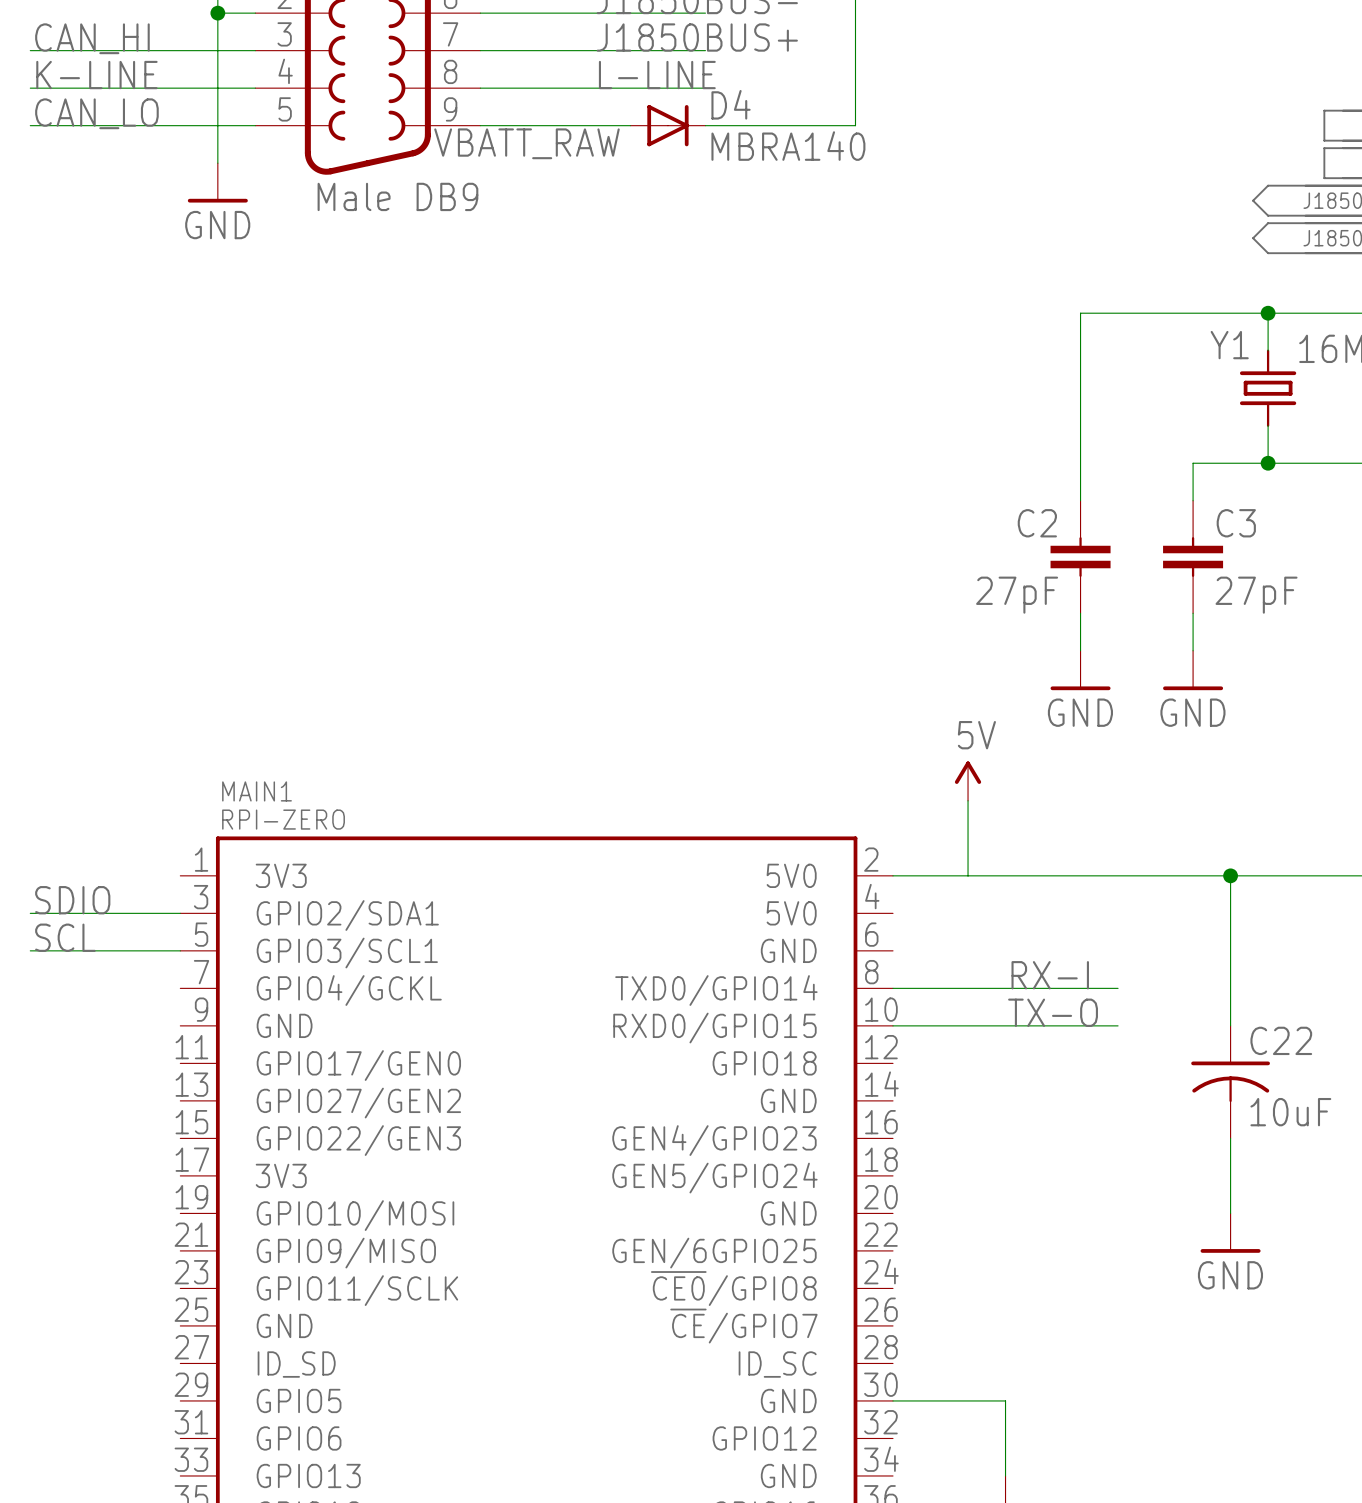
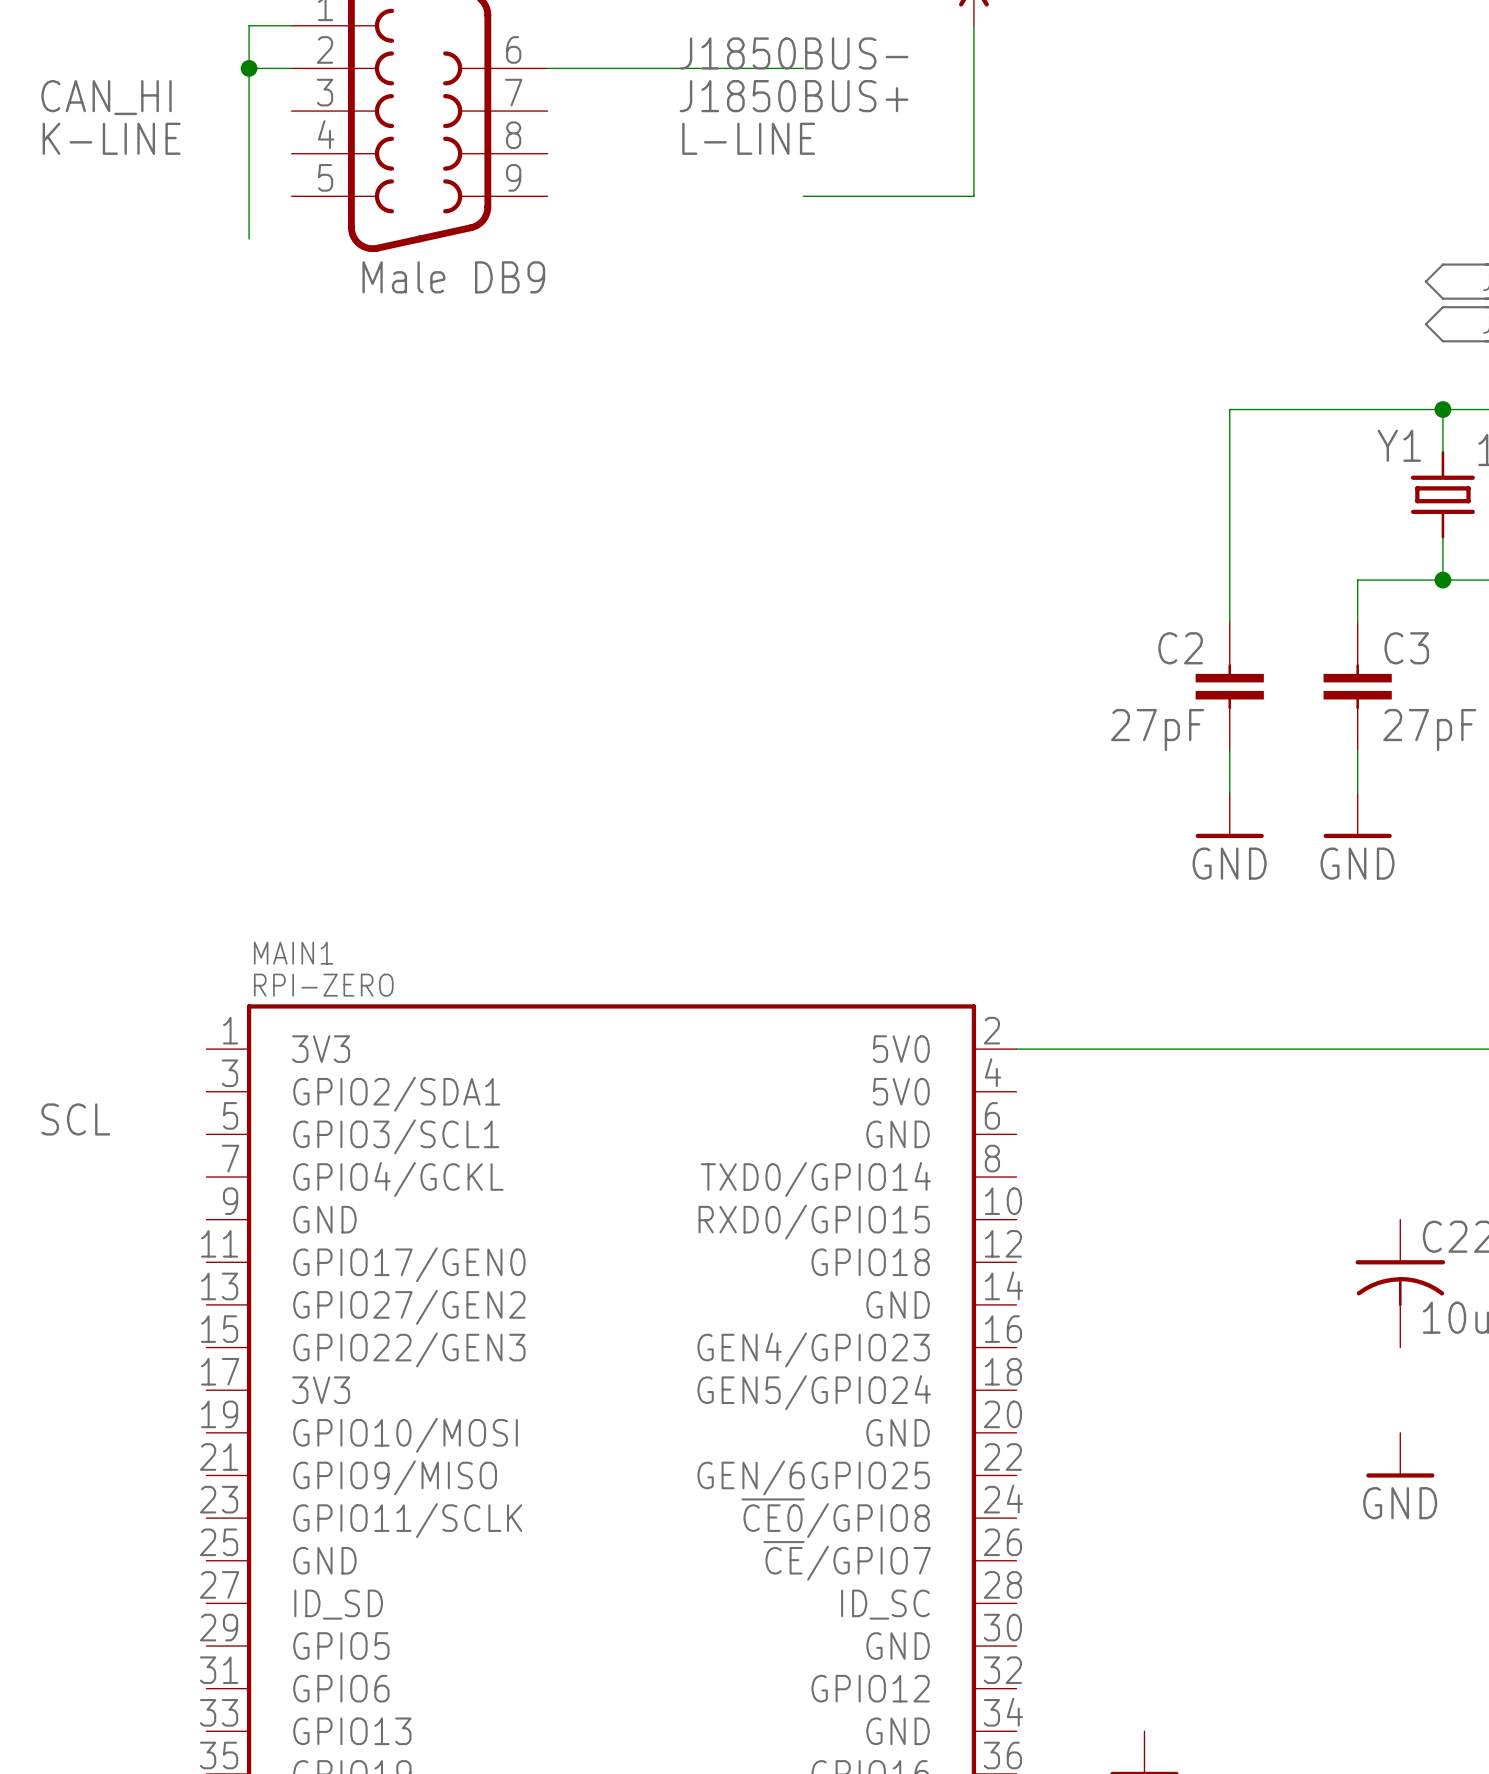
wire: (30, 50) (255, 50) -> none
wire: (480, 50) (705, 50) -> none
wire: (30, 88) (255, 88) -> none
wire: (480, 88) (705, 88) -> none
label: CAN_LO (96, 113) -> none
wire: (30, 125) (255, 125) -> none
wire: (480, 125) (630, 125) -> none
D4: MBRA140 (667, 125) -> none
label: VBATT_RAW (526, 143) -> none
power symbol: GND (217, 182) -> none
power symbol: 5V (968, 781) -> none
wire: (968, 800) (968, 875) -> none
wire: (1230, 875) (1230, 1025) -> none
junction: (1230, 875) -> none
label: SDIO (72, 900) -> none
wire: (30, 913) (180, 913) -> none
wire: (30, 950) (180, 950) -> none
label: RX-I (1050, 975) -> none
wire: (893, 988) (1118, 988) -> none
label: TX-O (1053, 1012) -> none
wire: (893, 1025) (1118, 1025) -> none
wire: (1230, 1138) (1230, 1213) -> none
wire: (893, 1400) (1005, 1400) (1005, 1475) -> none

